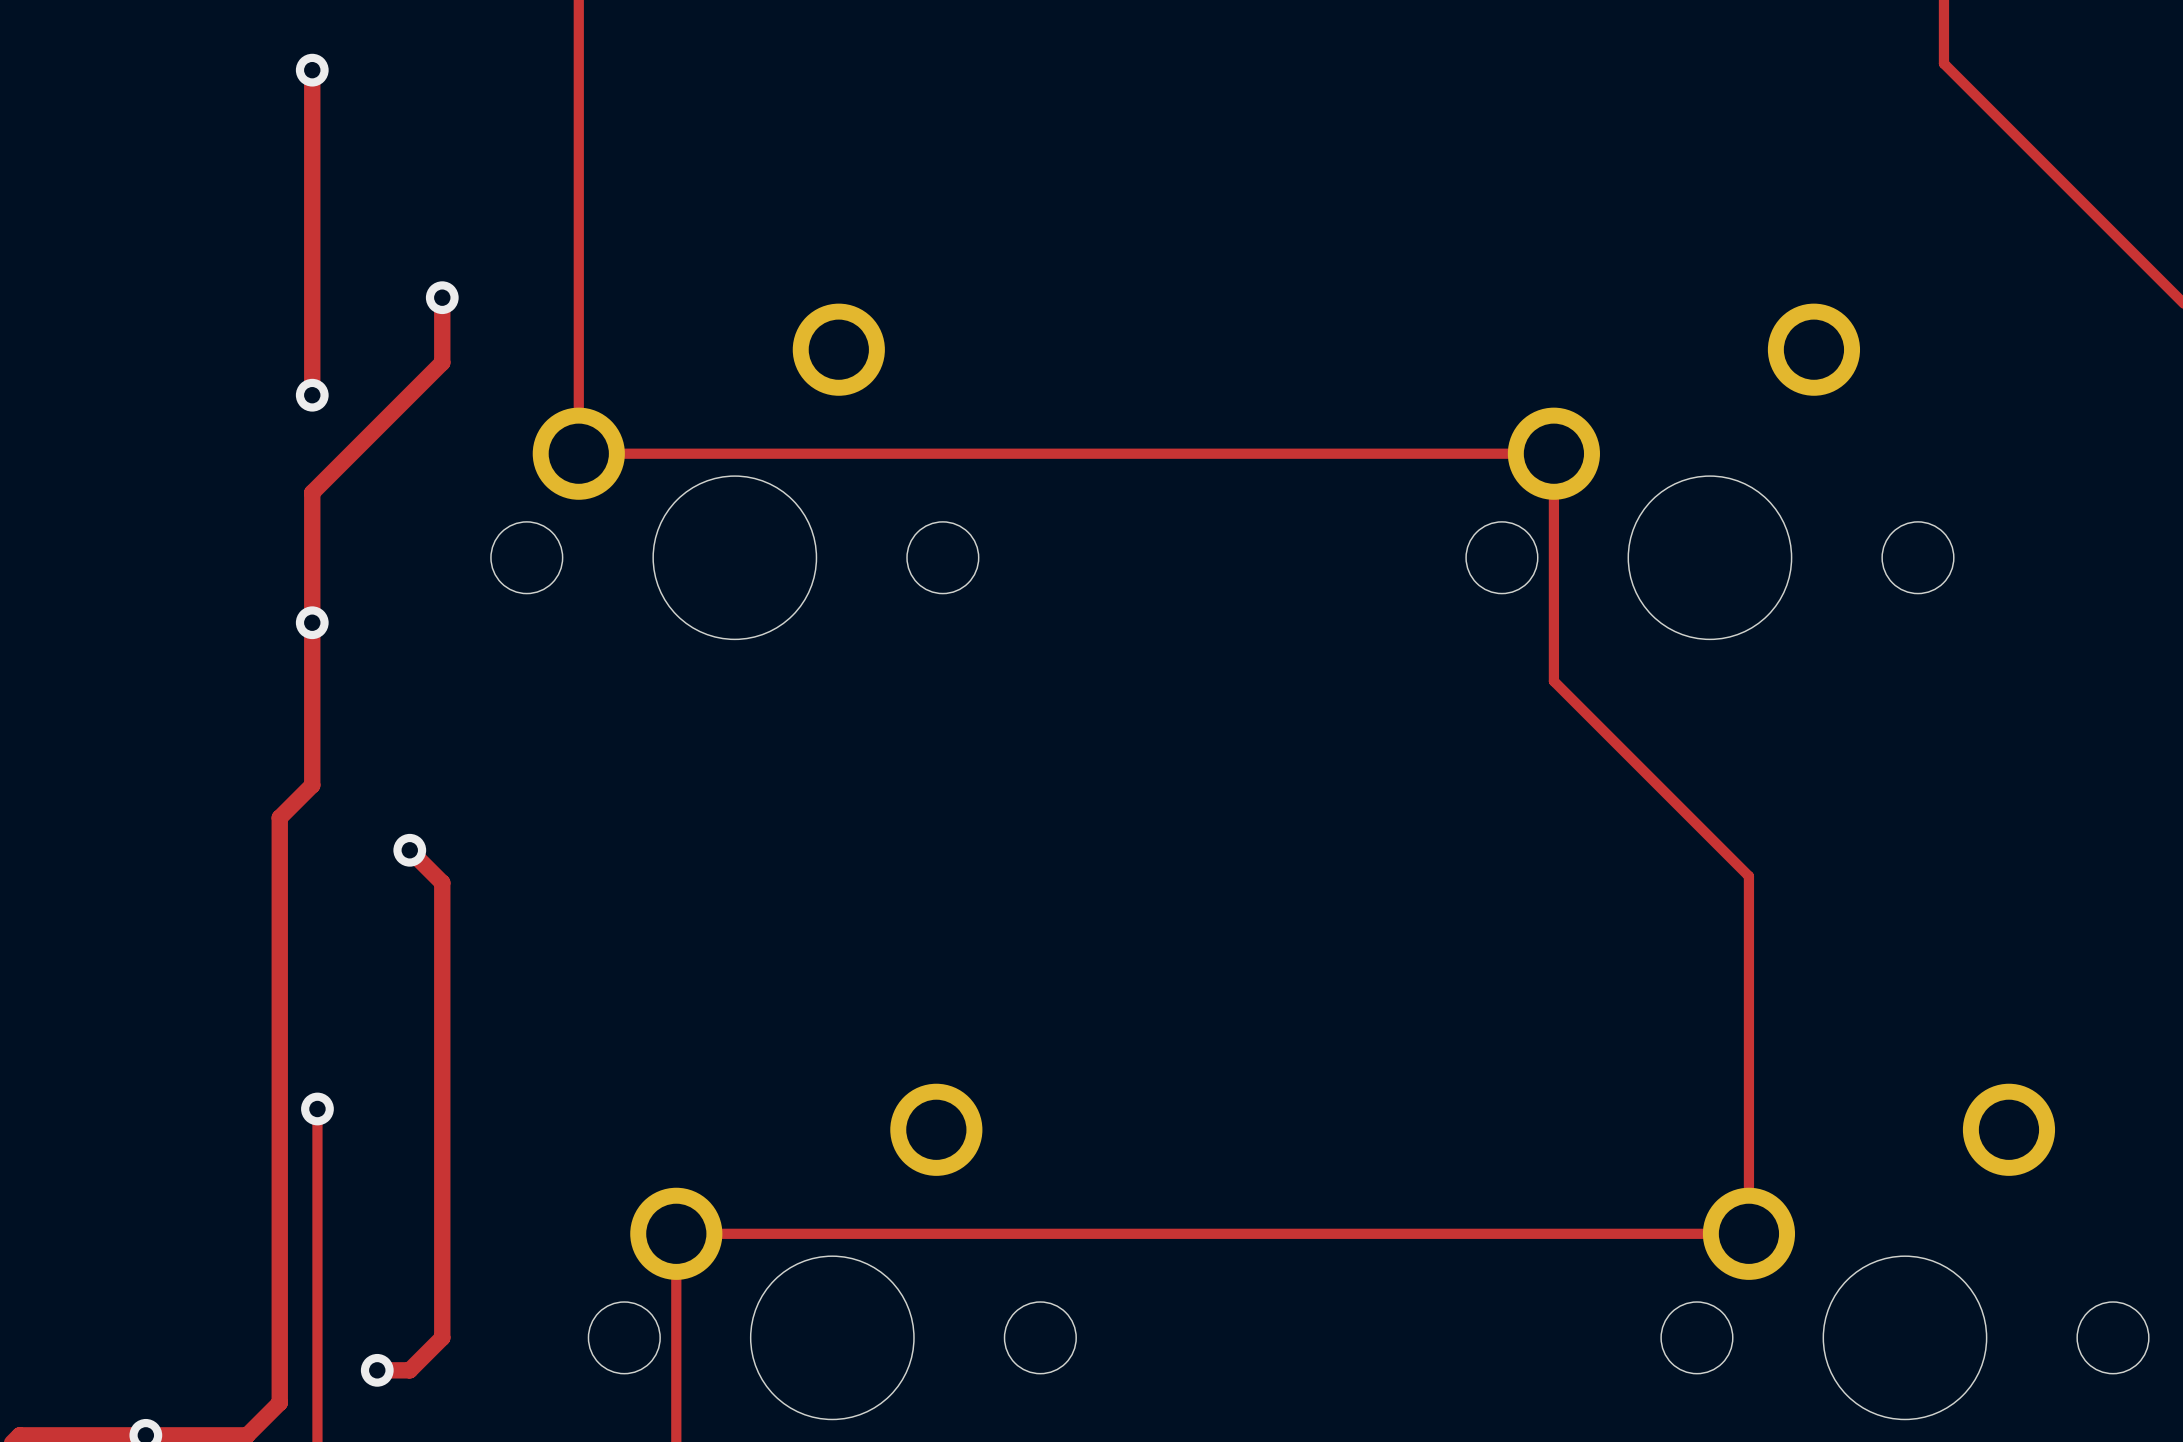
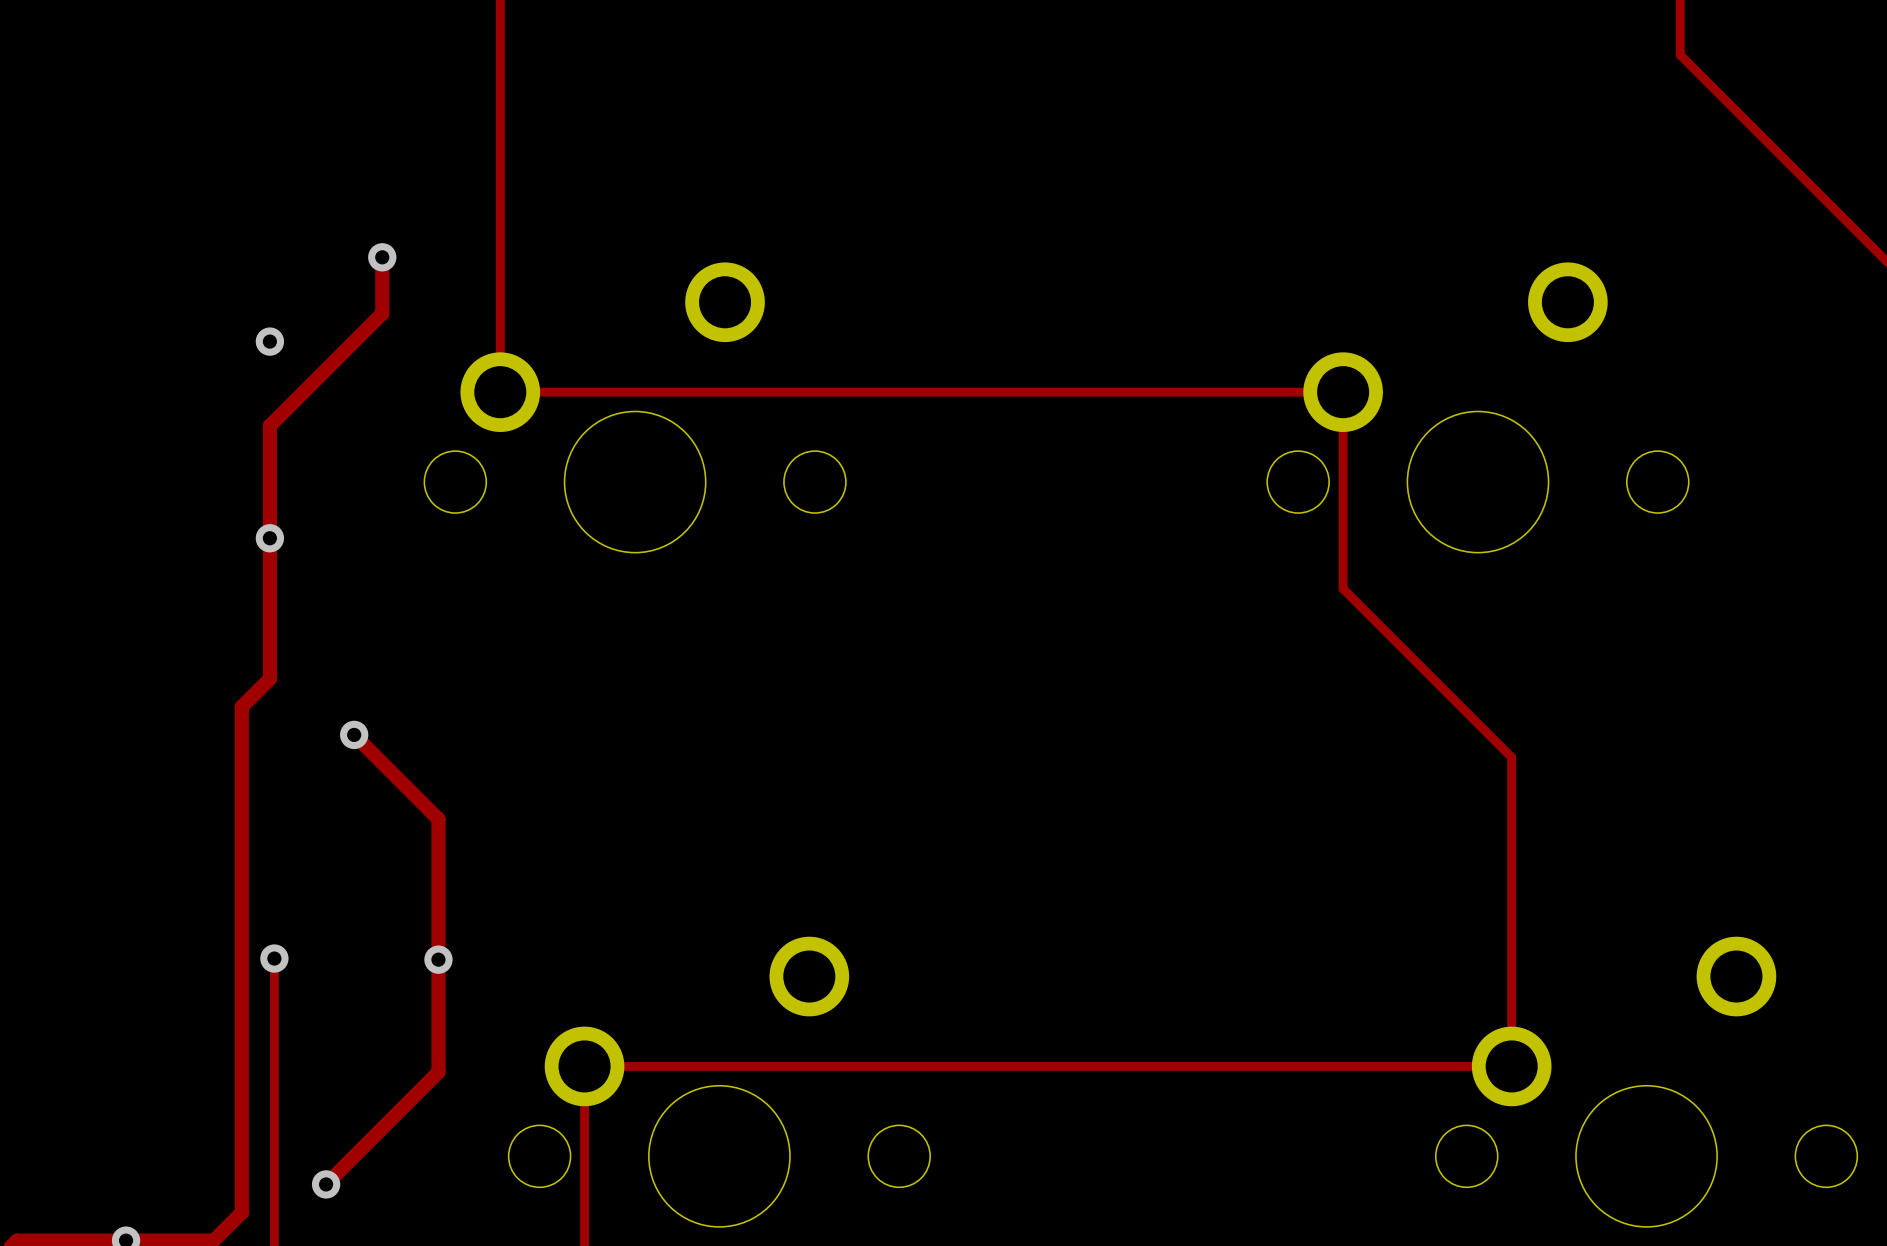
track: (312, 70) (312, 395) -> none
via: (312, 70) -> none
track: (442, 882) (442, 1337) (409, 1370) (377, 1370) -> (382, 763) (438, 819) (438, 1072) (326, 1184)
via: none -> (438, 959)

